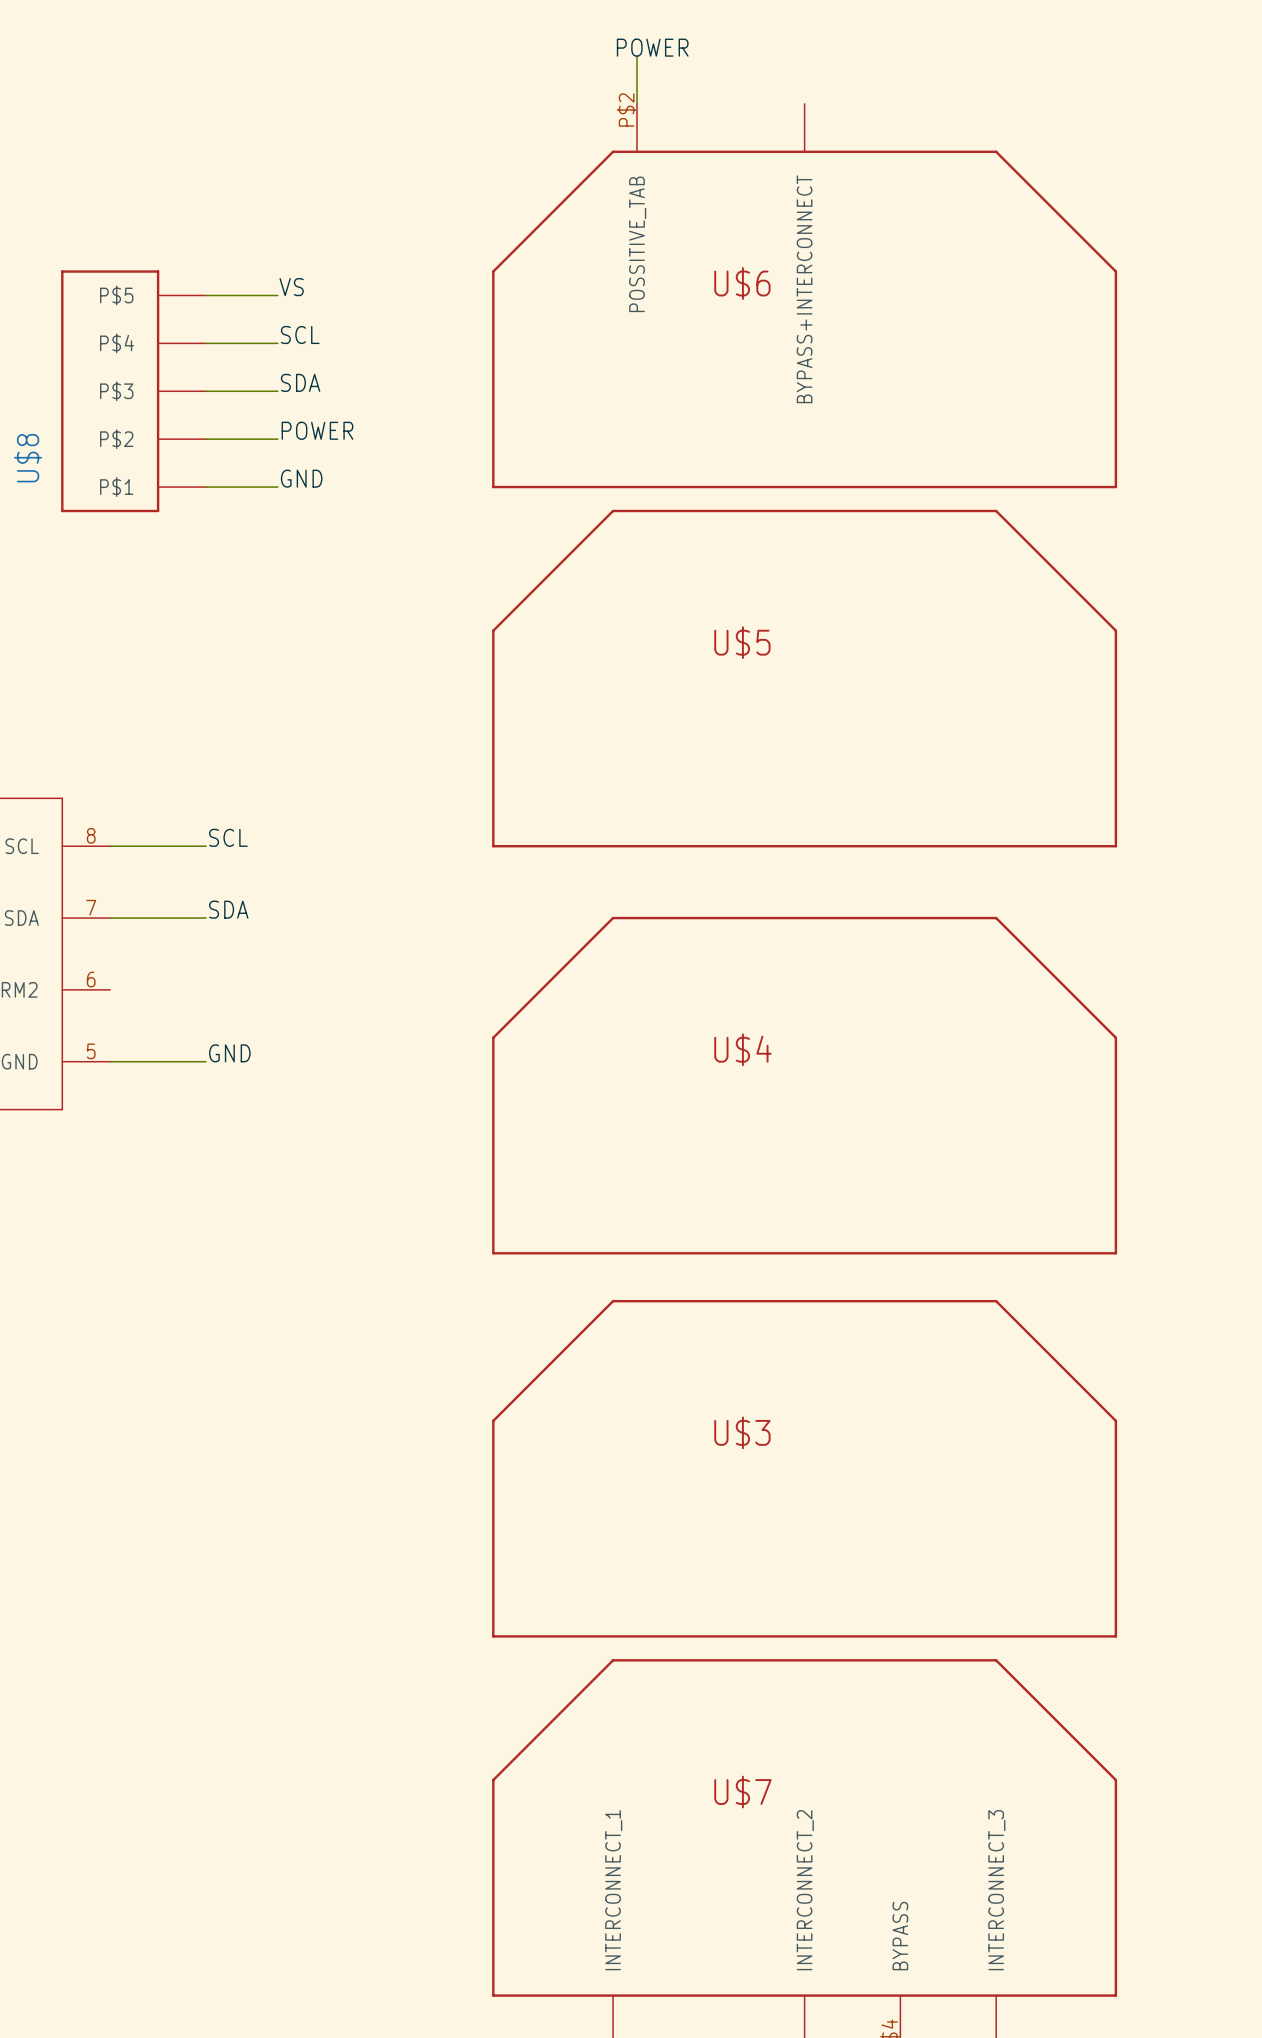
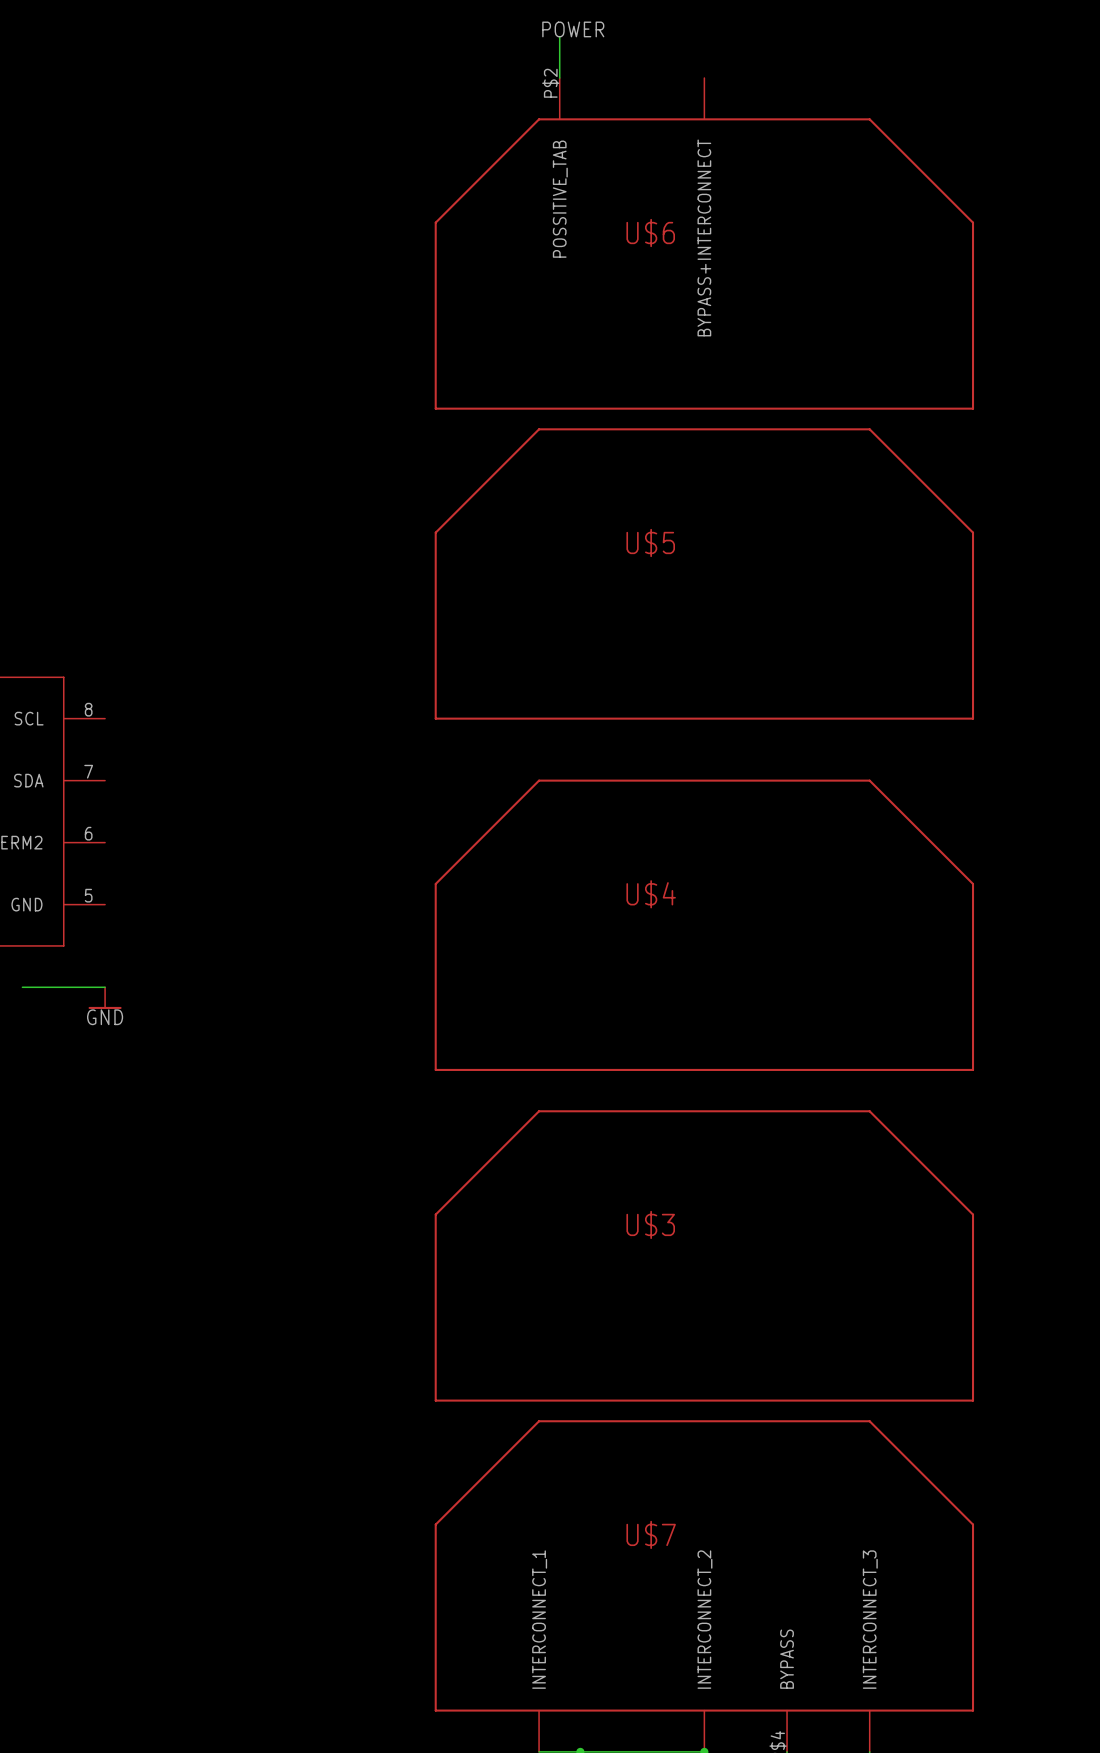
label: VS (291, 287) -> none
wire: (205, 295) (277, 295) -> none
label: SCL (300, 334) -> none
wire: (205, 343) (277, 343) -> none
label: SDA (300, 382) -> none
U$8: (133, 391) -> none
wire: (205, 391) (277, 391) -> none
label: POWER (317, 430) -> none
wire: (205, 439) (277, 439) -> none
label: GND (301, 478) -> none
wire: (205, 487) (277, 487) -> none
label: SCL (228, 837) -> none
wire: (110, 846) (205, 846) -> none
label: SDA (228, 909) -> none
wire: (110, 918) (205, 918) -> none
label: GND (229, 1053) -> none
wire: (110, 1061) (205, 1061) -> (22, 987) (105, 987)
power symbol: none -> GND (105, 998)

